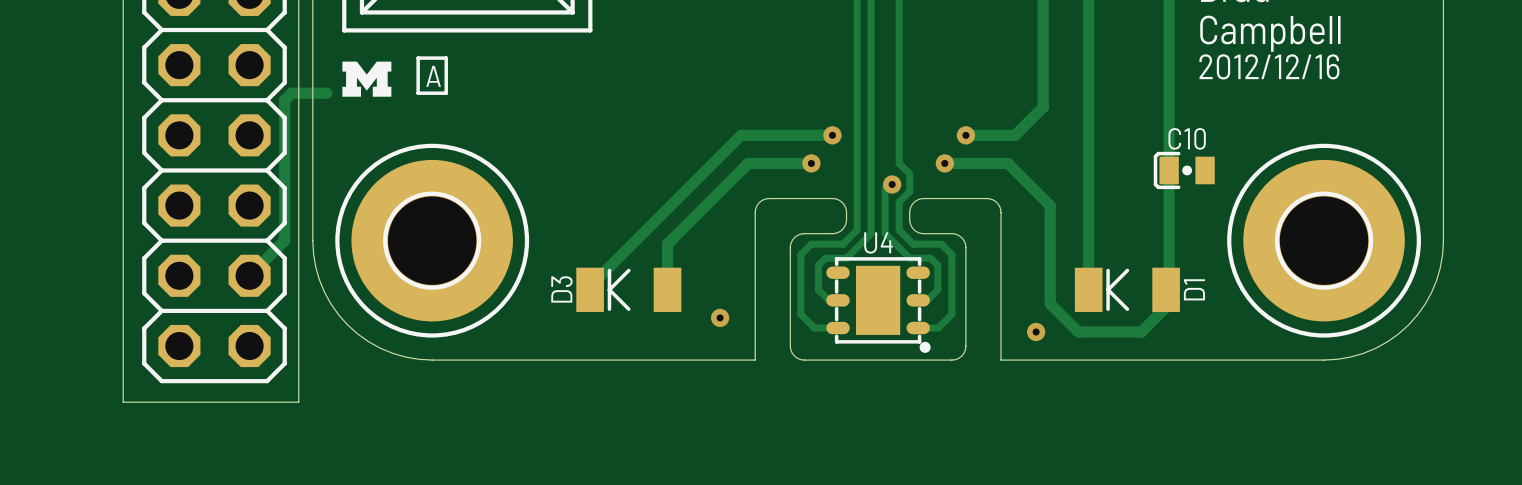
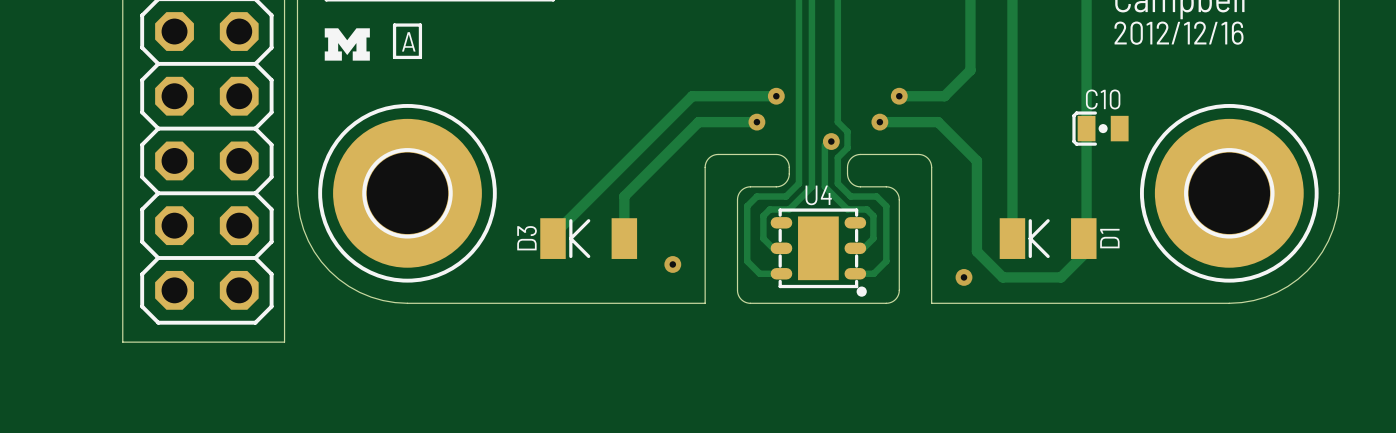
track: (326, 93) (291, 93) (284, 100) (284, 240) (249, 275) -> none

